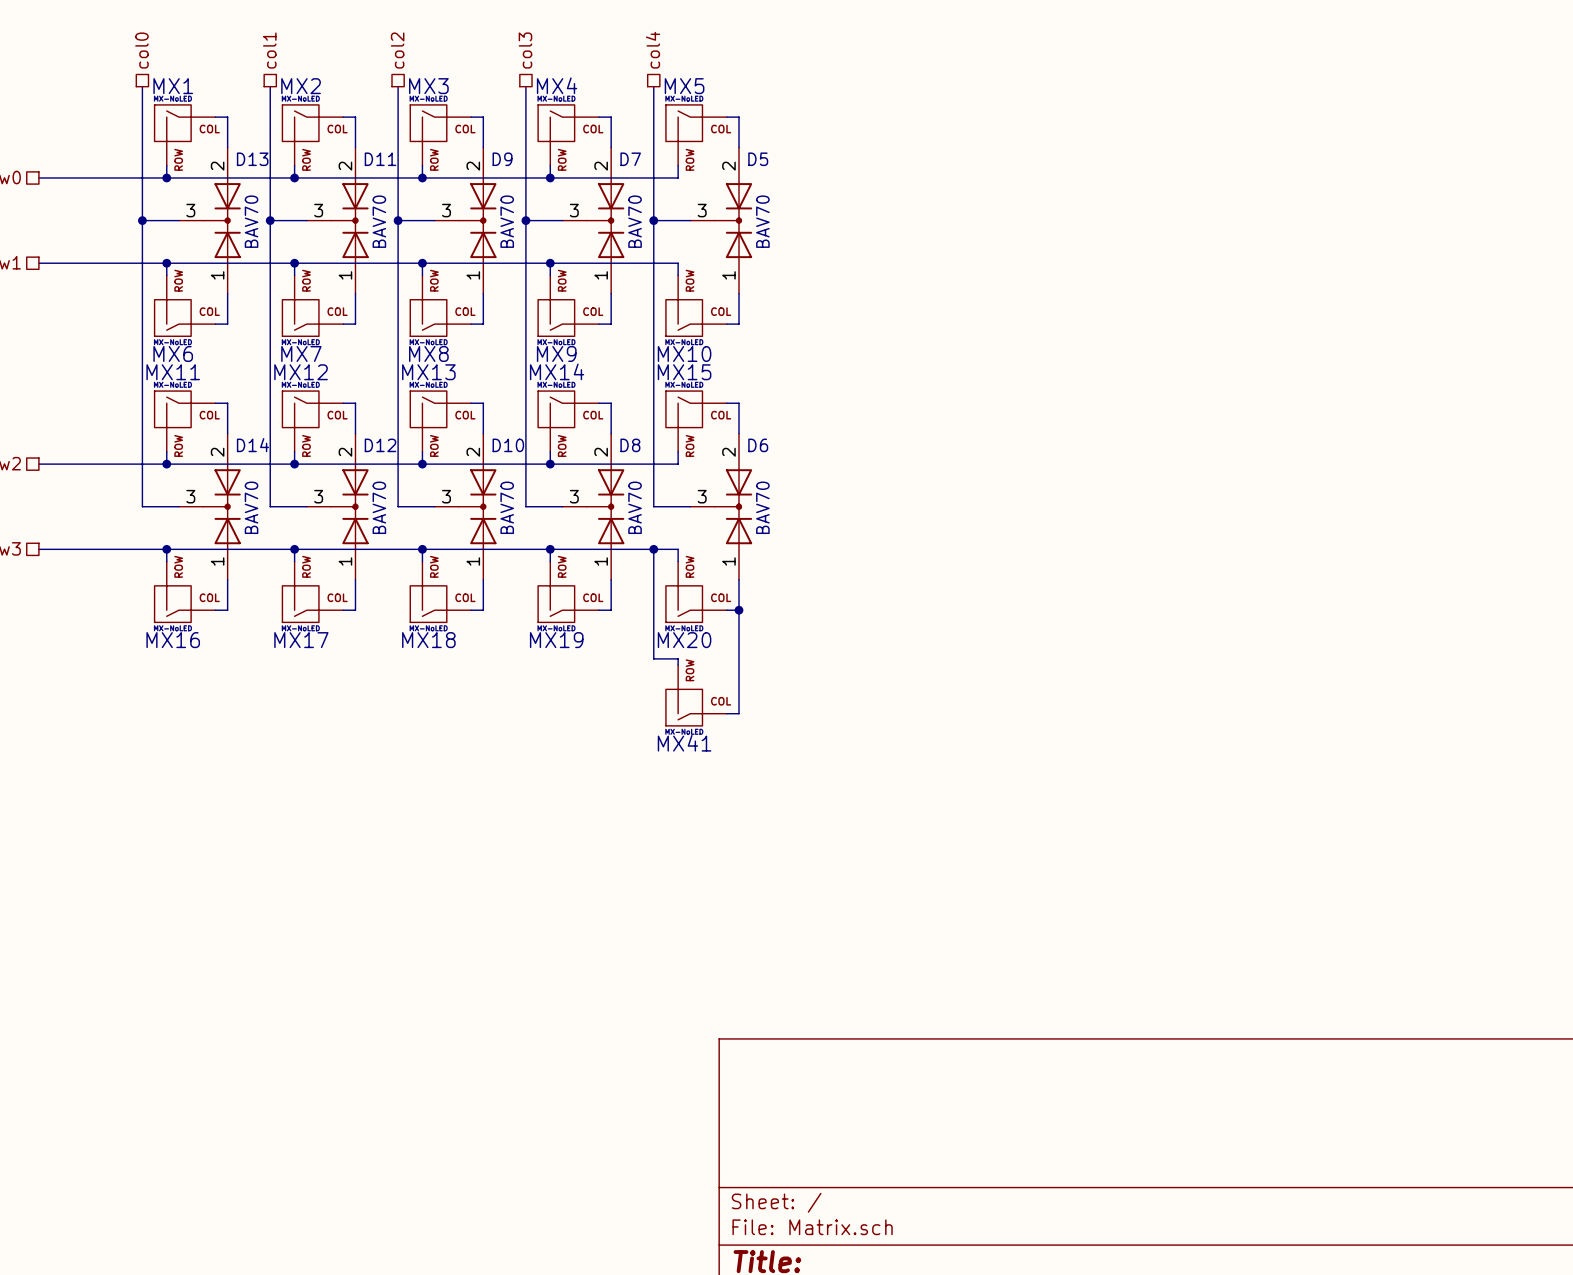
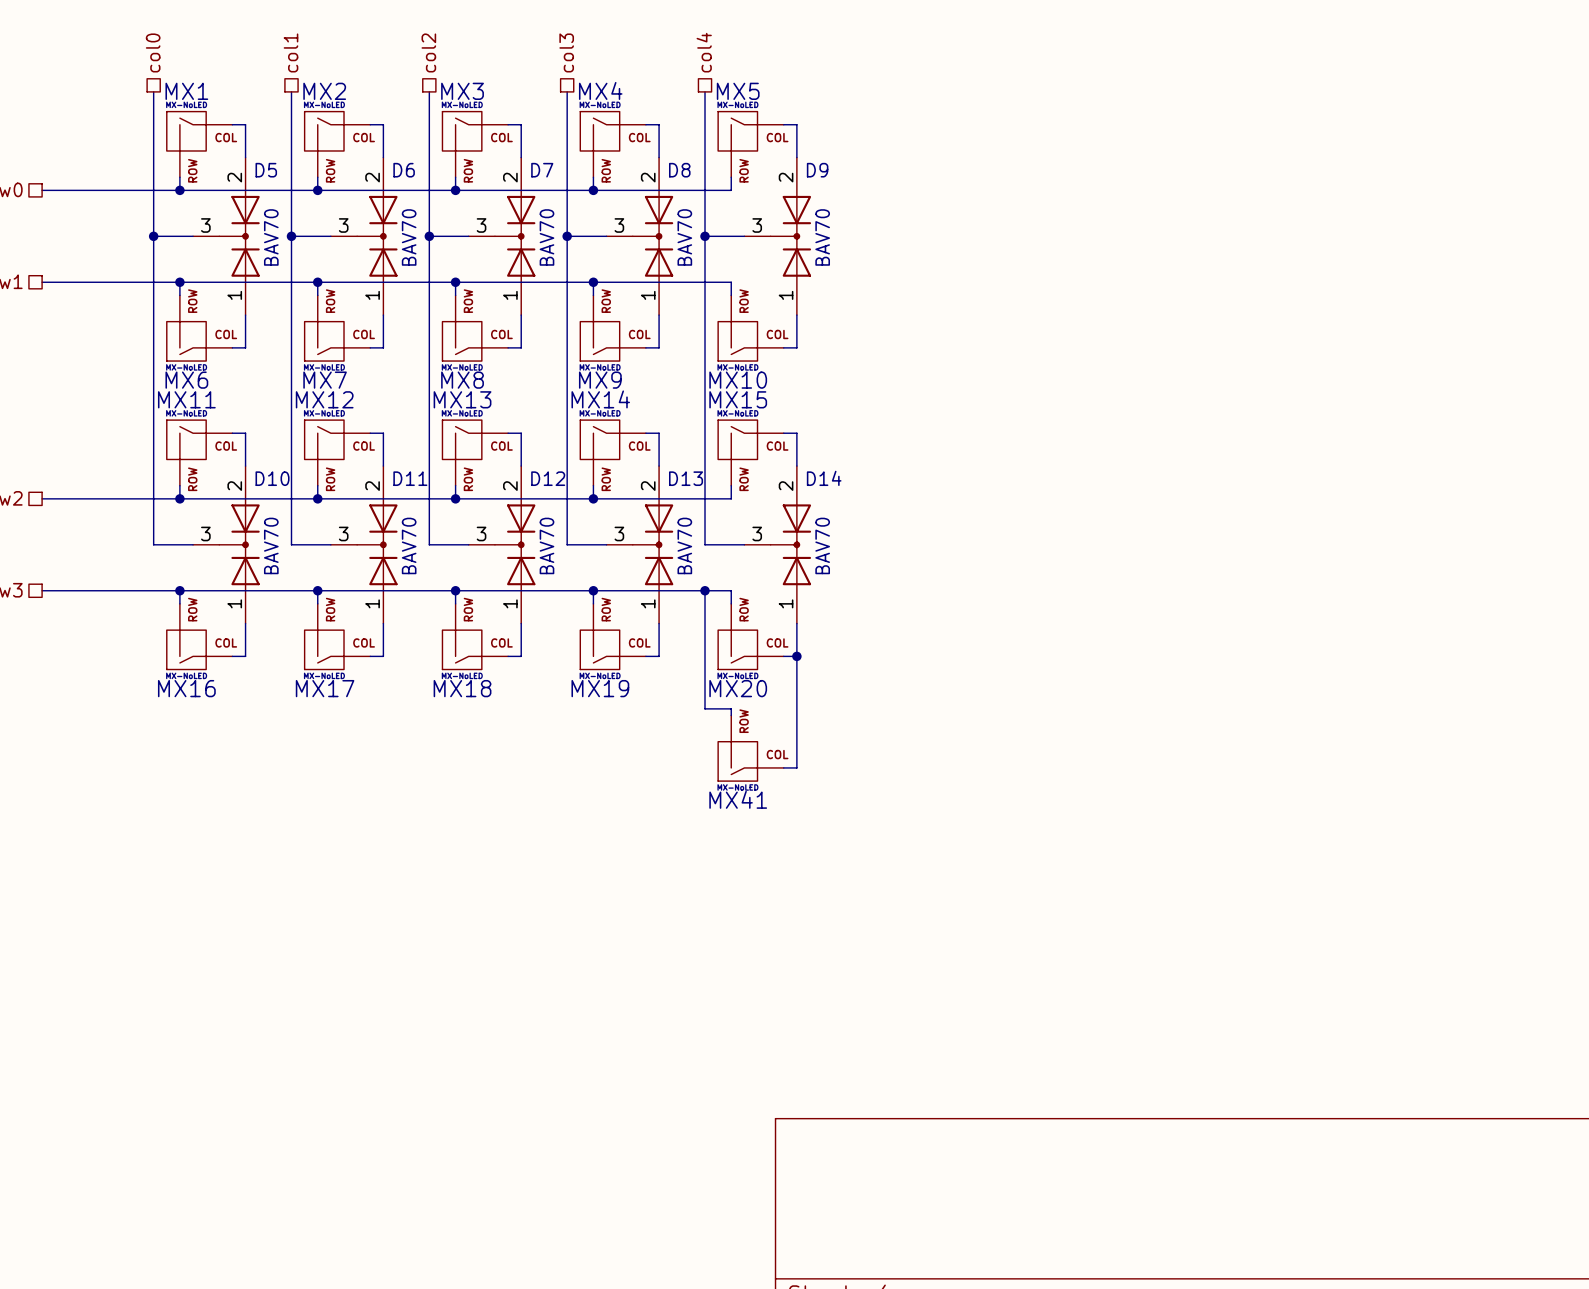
D13 name: D13 (252, 159) -> D5 (266, 170)
D11 name: D11 (380, 159) -> D6 (404, 170)
D9 name: D9 (502, 159) -> D7 (542, 170)
D7 name: D7 (630, 159) -> D8 (679, 170)
D5 name: D5 (758, 159) -> D9 (817, 170)
D14 name: D14 (252, 445) -> D10 (272, 478)
D12 name: D12 (380, 445) -> D11 (410, 478)
D10 name: D10 (508, 445) -> D12 (548, 478)
D8 name: D8 (630, 445) -> D13 (686, 478)
D6 name: D6 (758, 445) -> D14 (824, 478)

